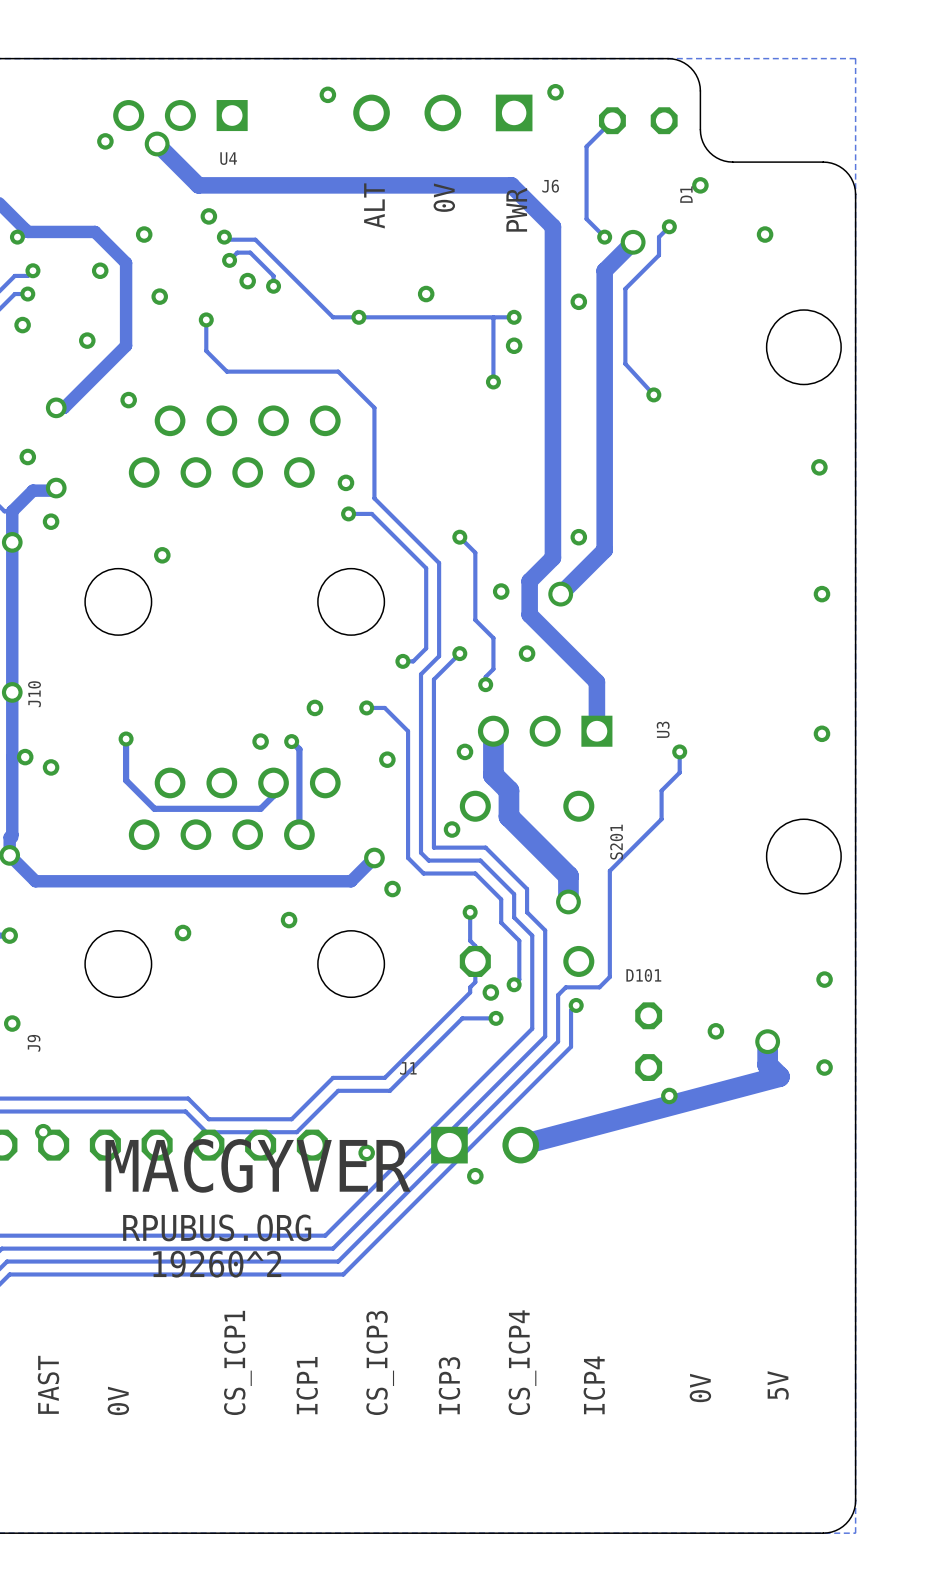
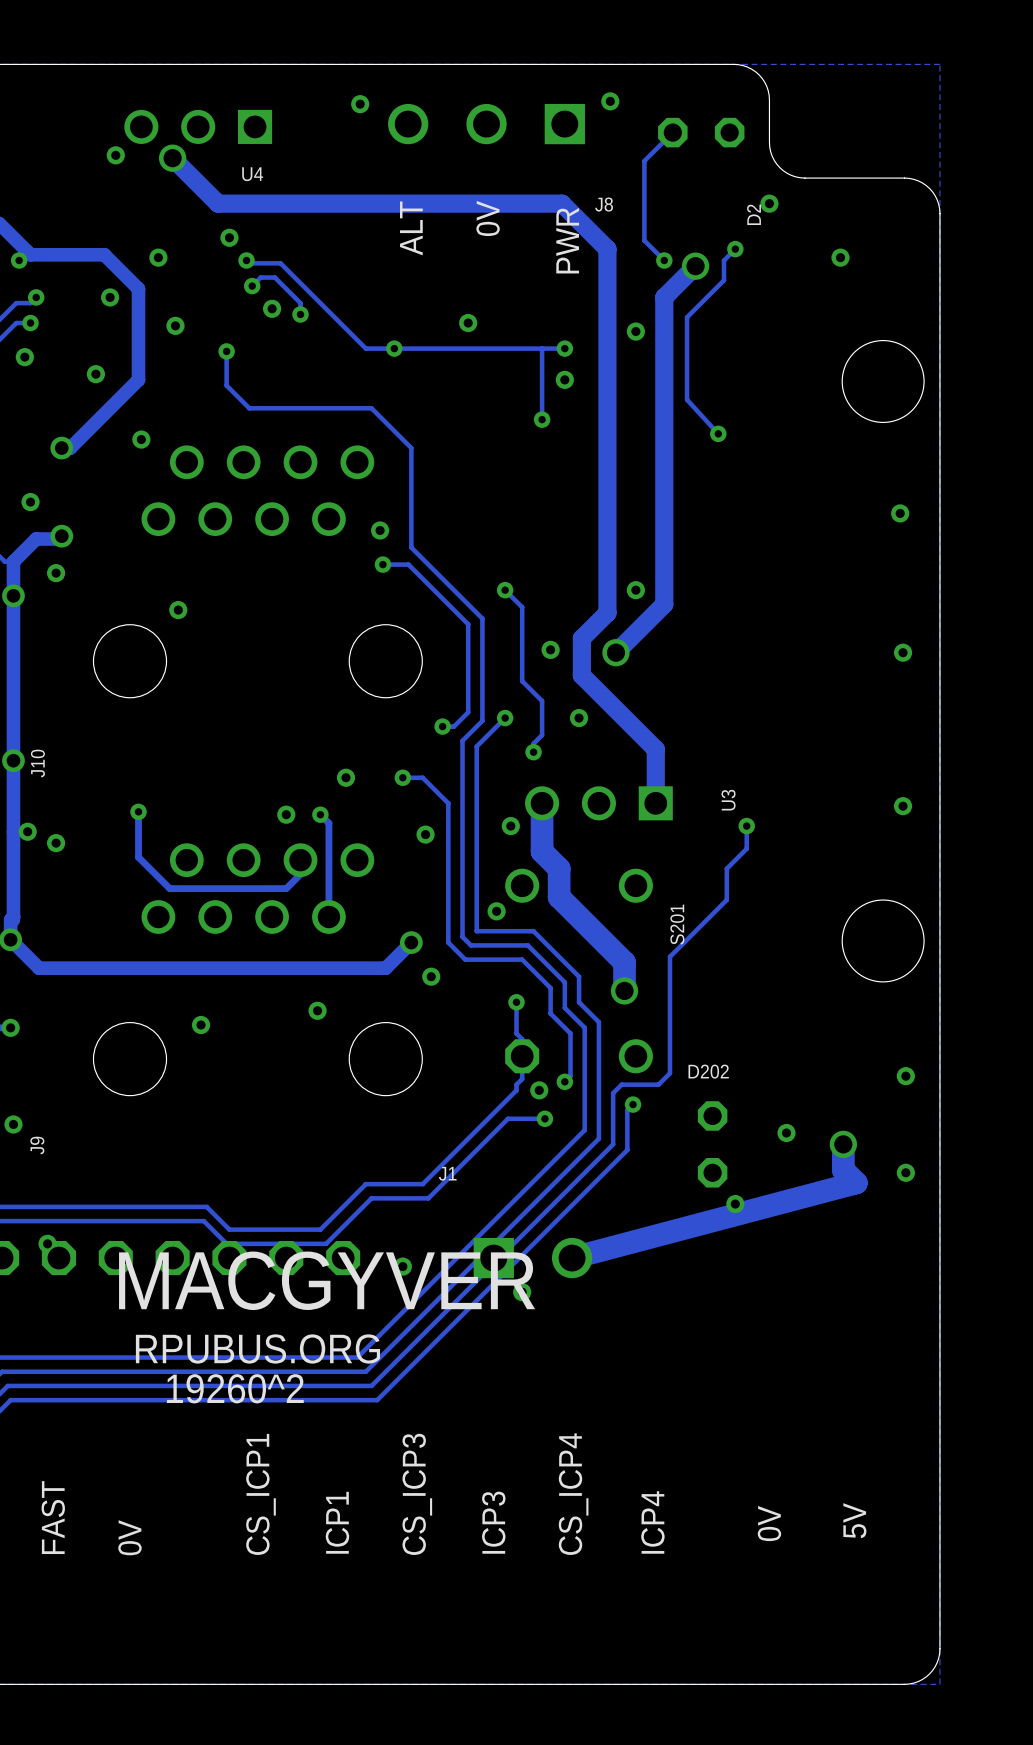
J6 name: J6 (550, 186) -> J8 (604, 204)
D1 name: D1 (686, 194) -> D2 (754, 214)
D101 name: D101 (643, 975) -> D202 (708, 1071)

